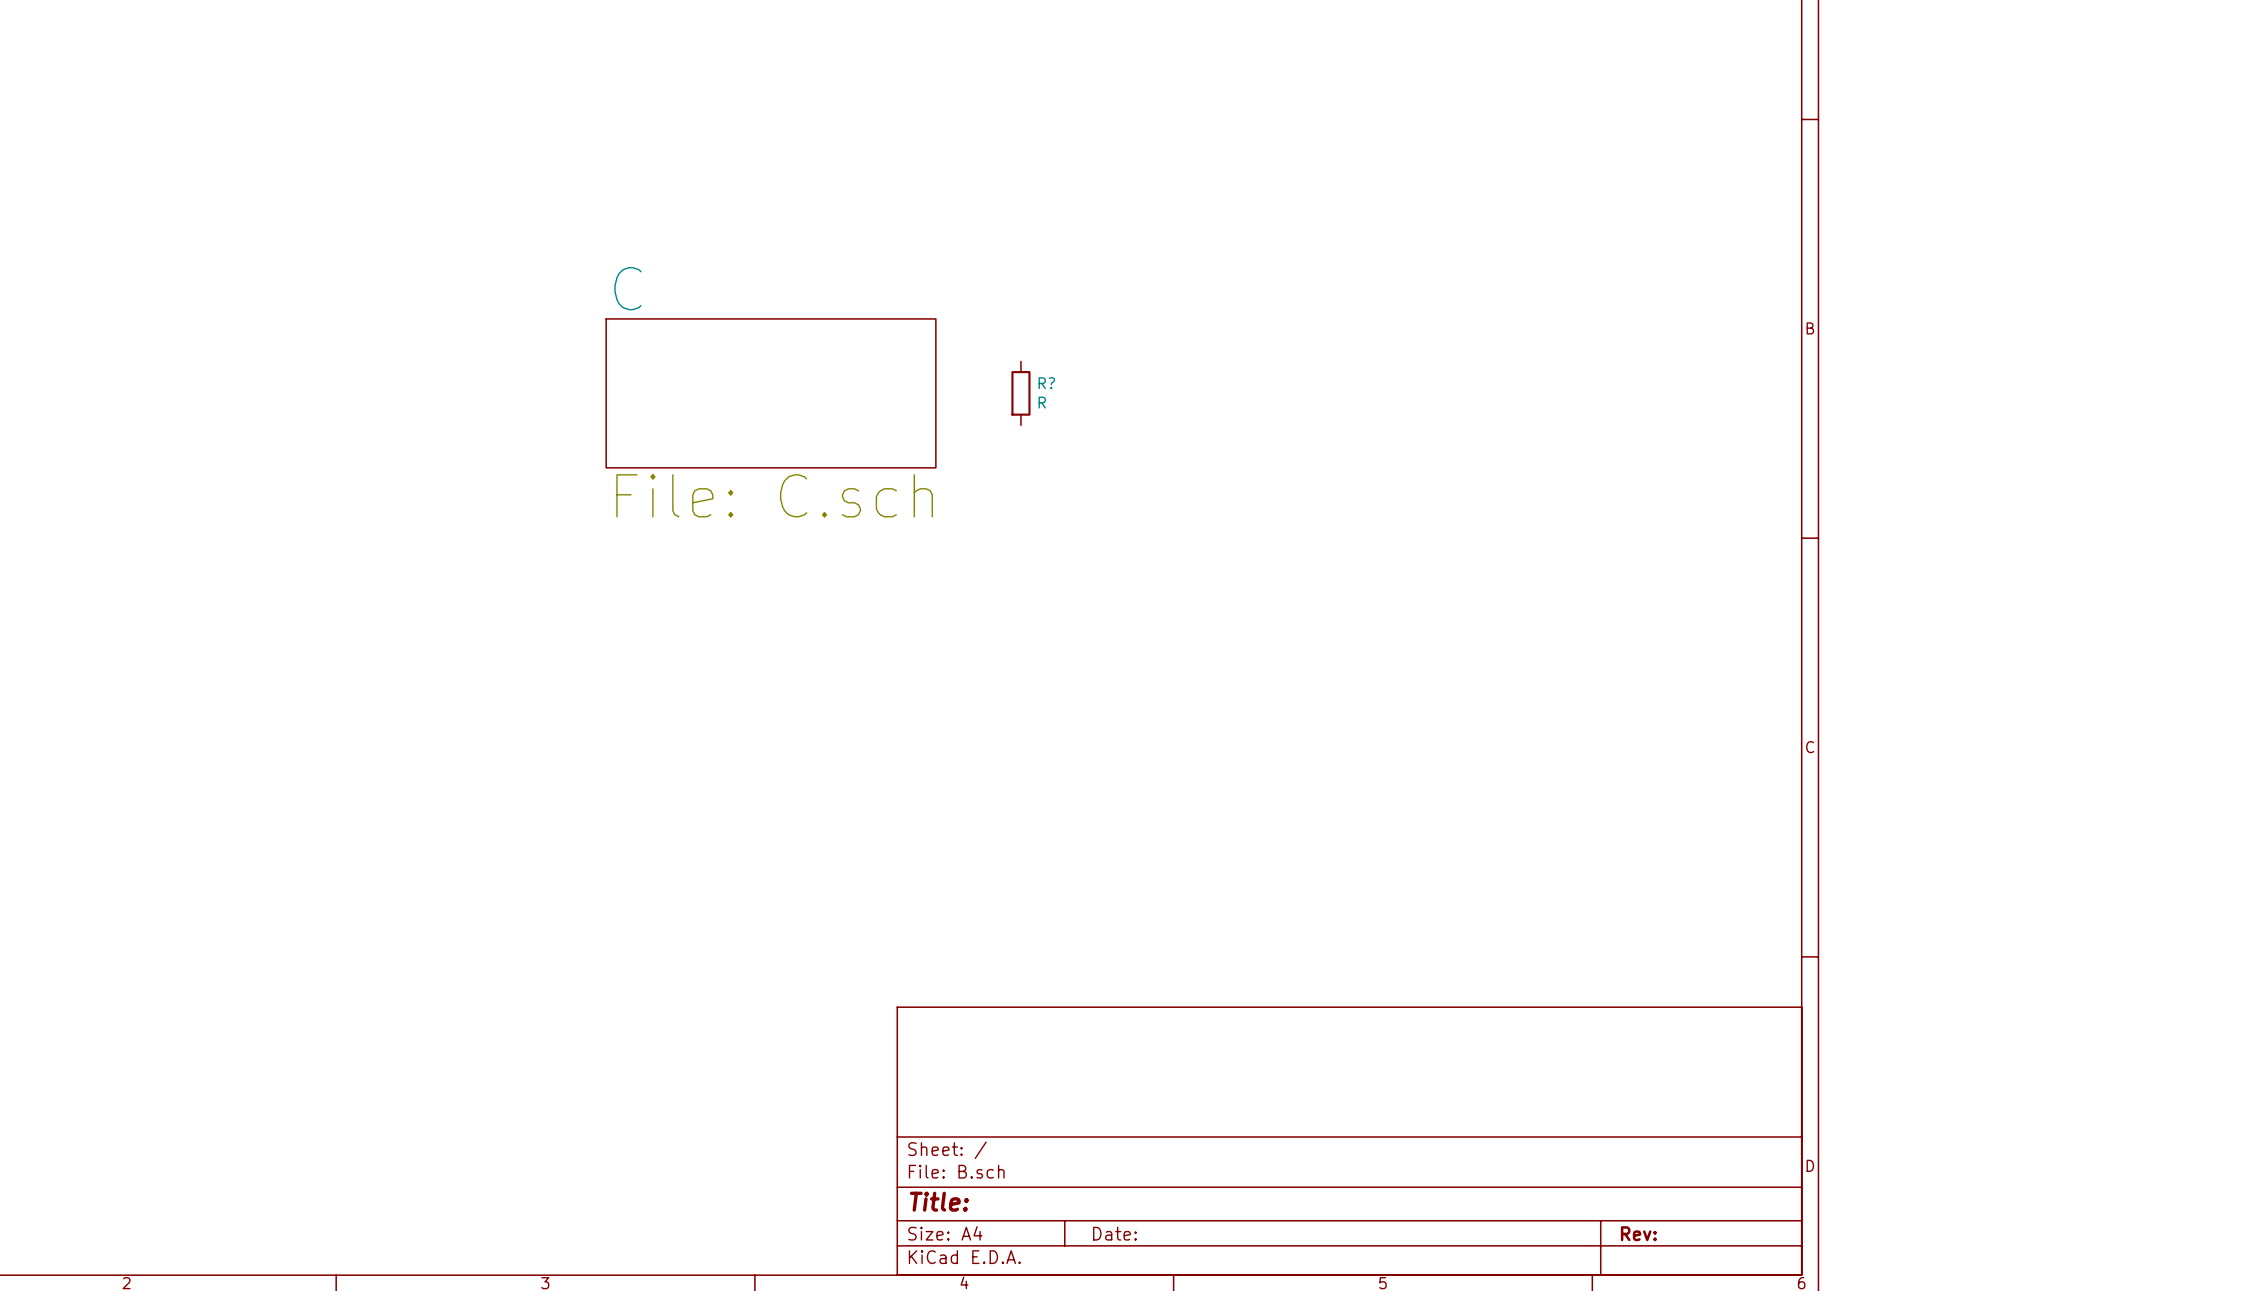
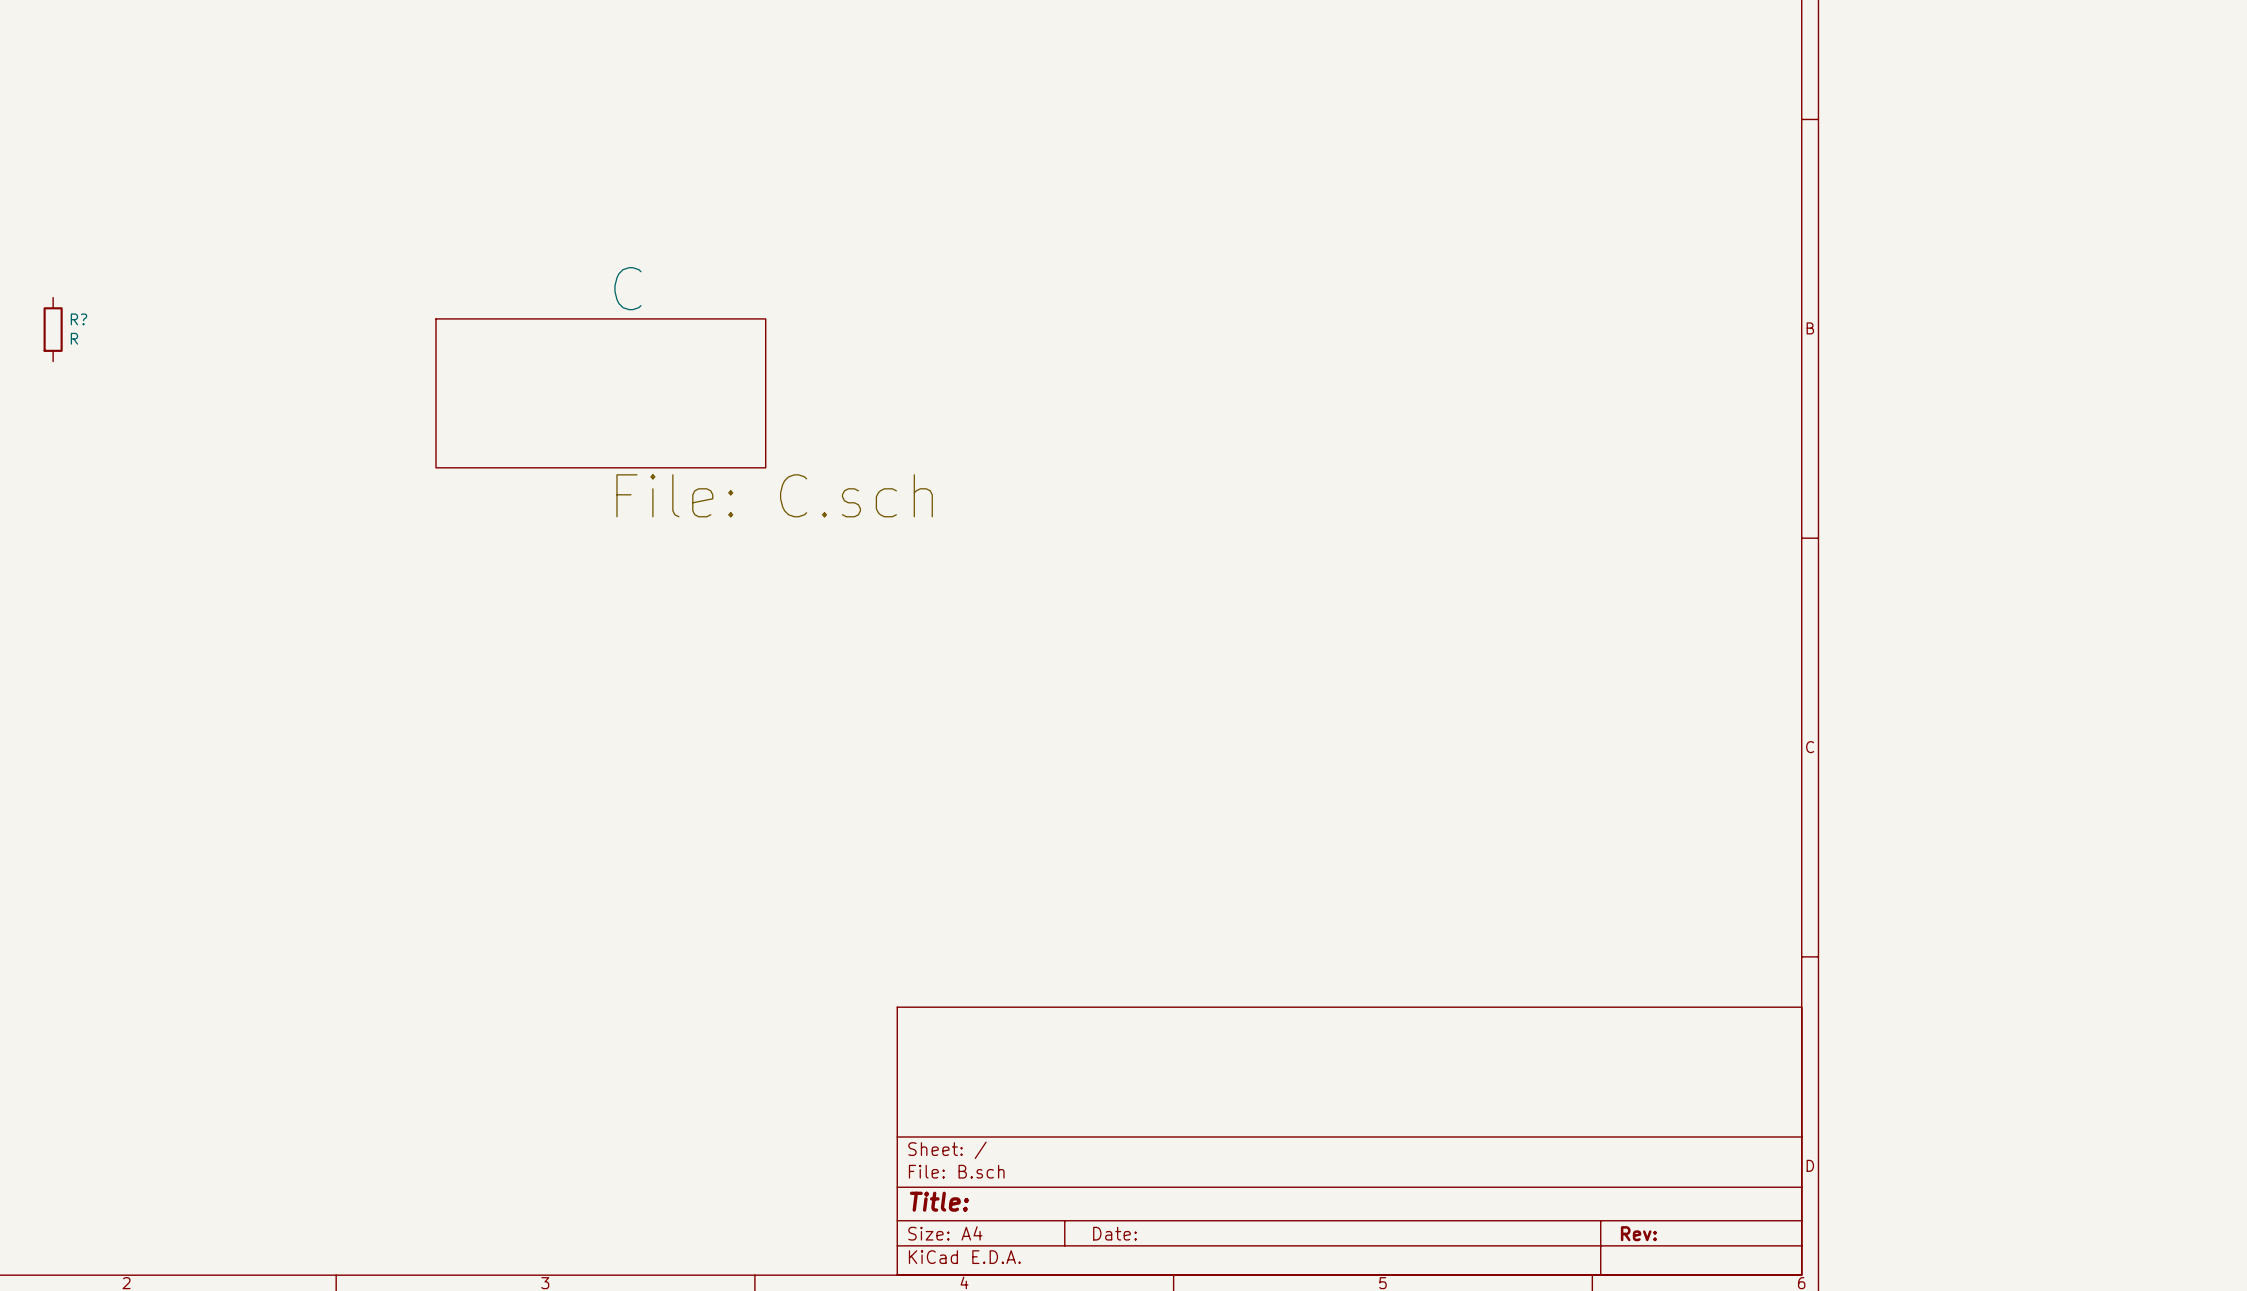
R?: none -> R (53, 329)
sheet C position: (771, 393) -> (600, 393)
R?: R (1020, 393) -> none

